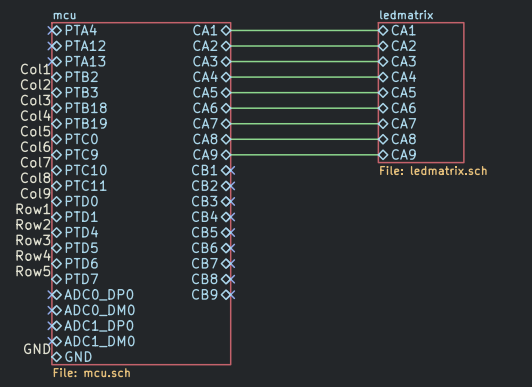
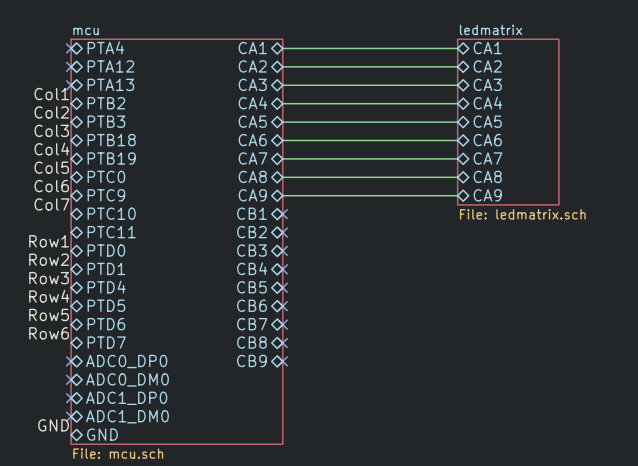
label: Col8 (35, 177) -> none
label: Col9 (35, 193) -> Row1 (49, 241)
label: Row1 (33, 208) -> Row2 (49, 259)
label: Row2 (33, 224) -> Row3 (49, 278)
label: Row3 (33, 239) -> Row4 (49, 296)
label: Row4 (33, 255) -> Row5 (49, 314)
label: Row5 (33, 271) -> Row6 (49, 333)

